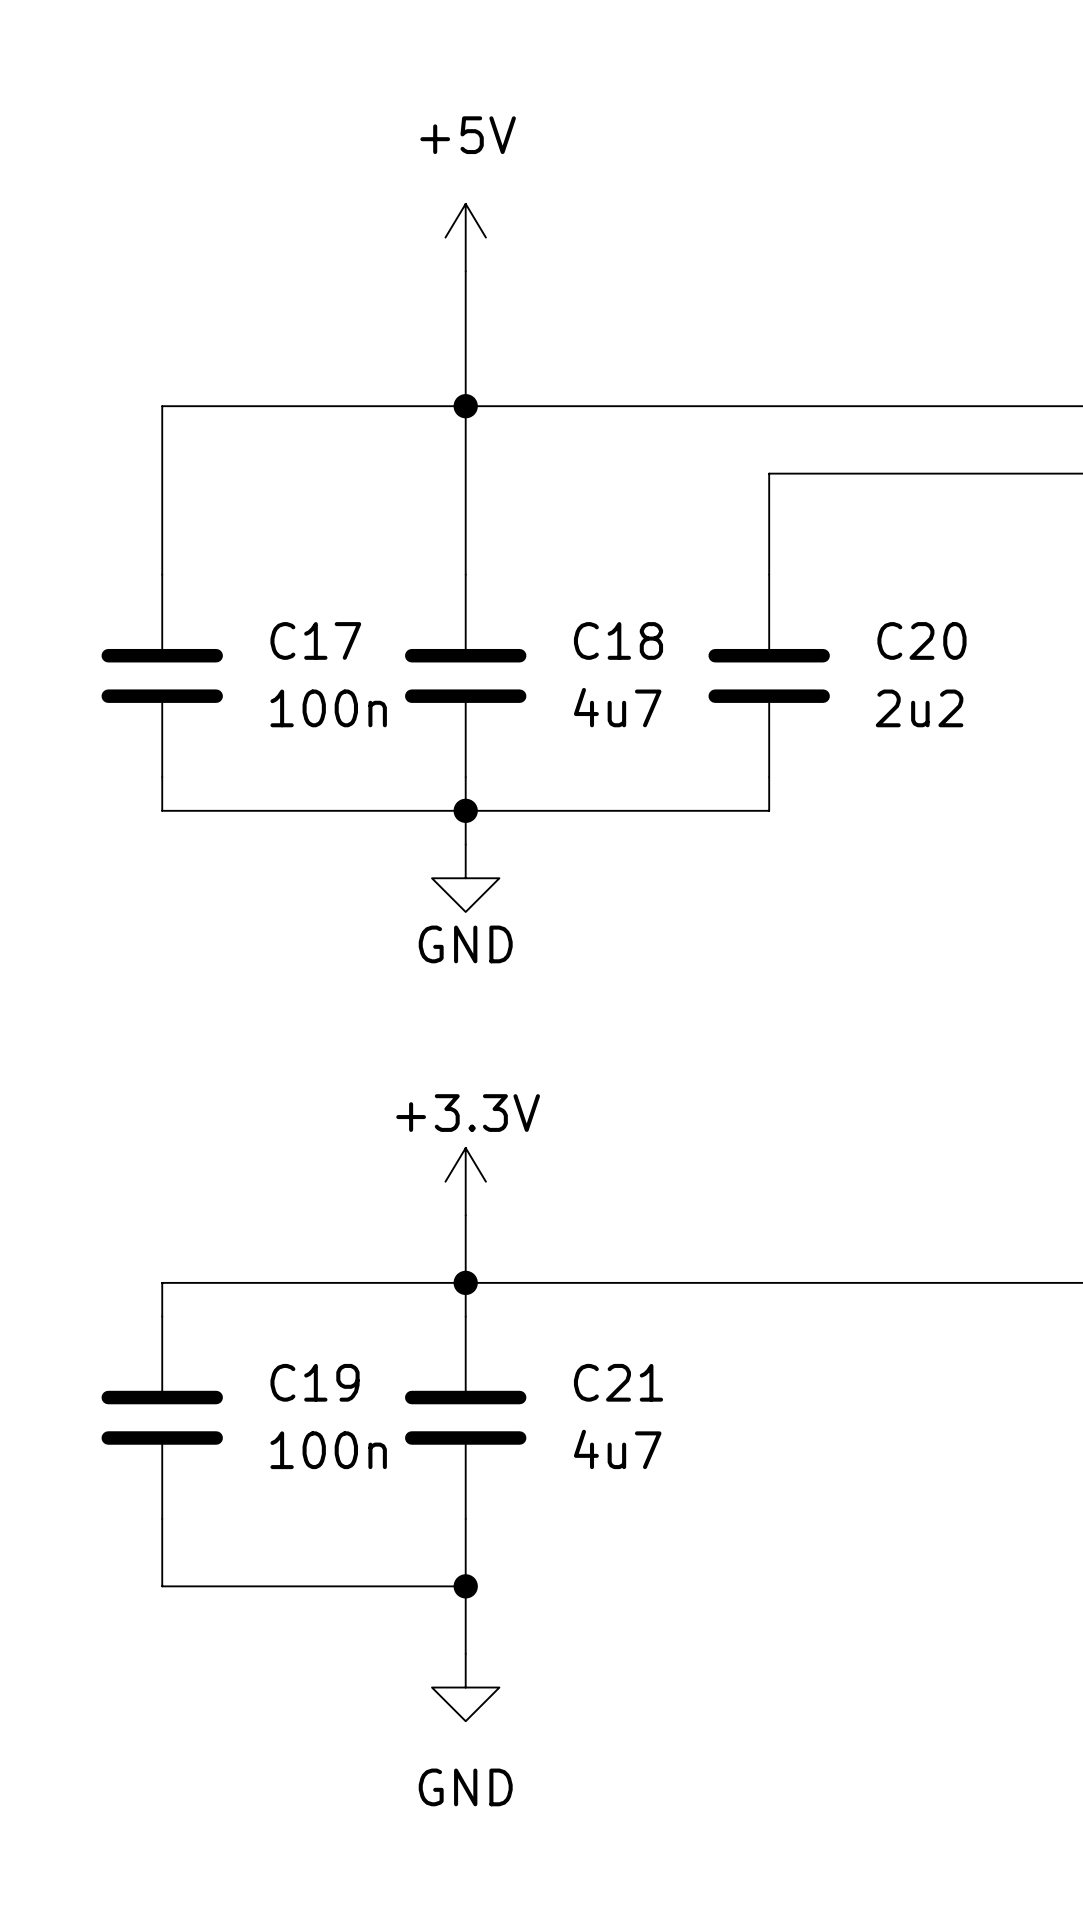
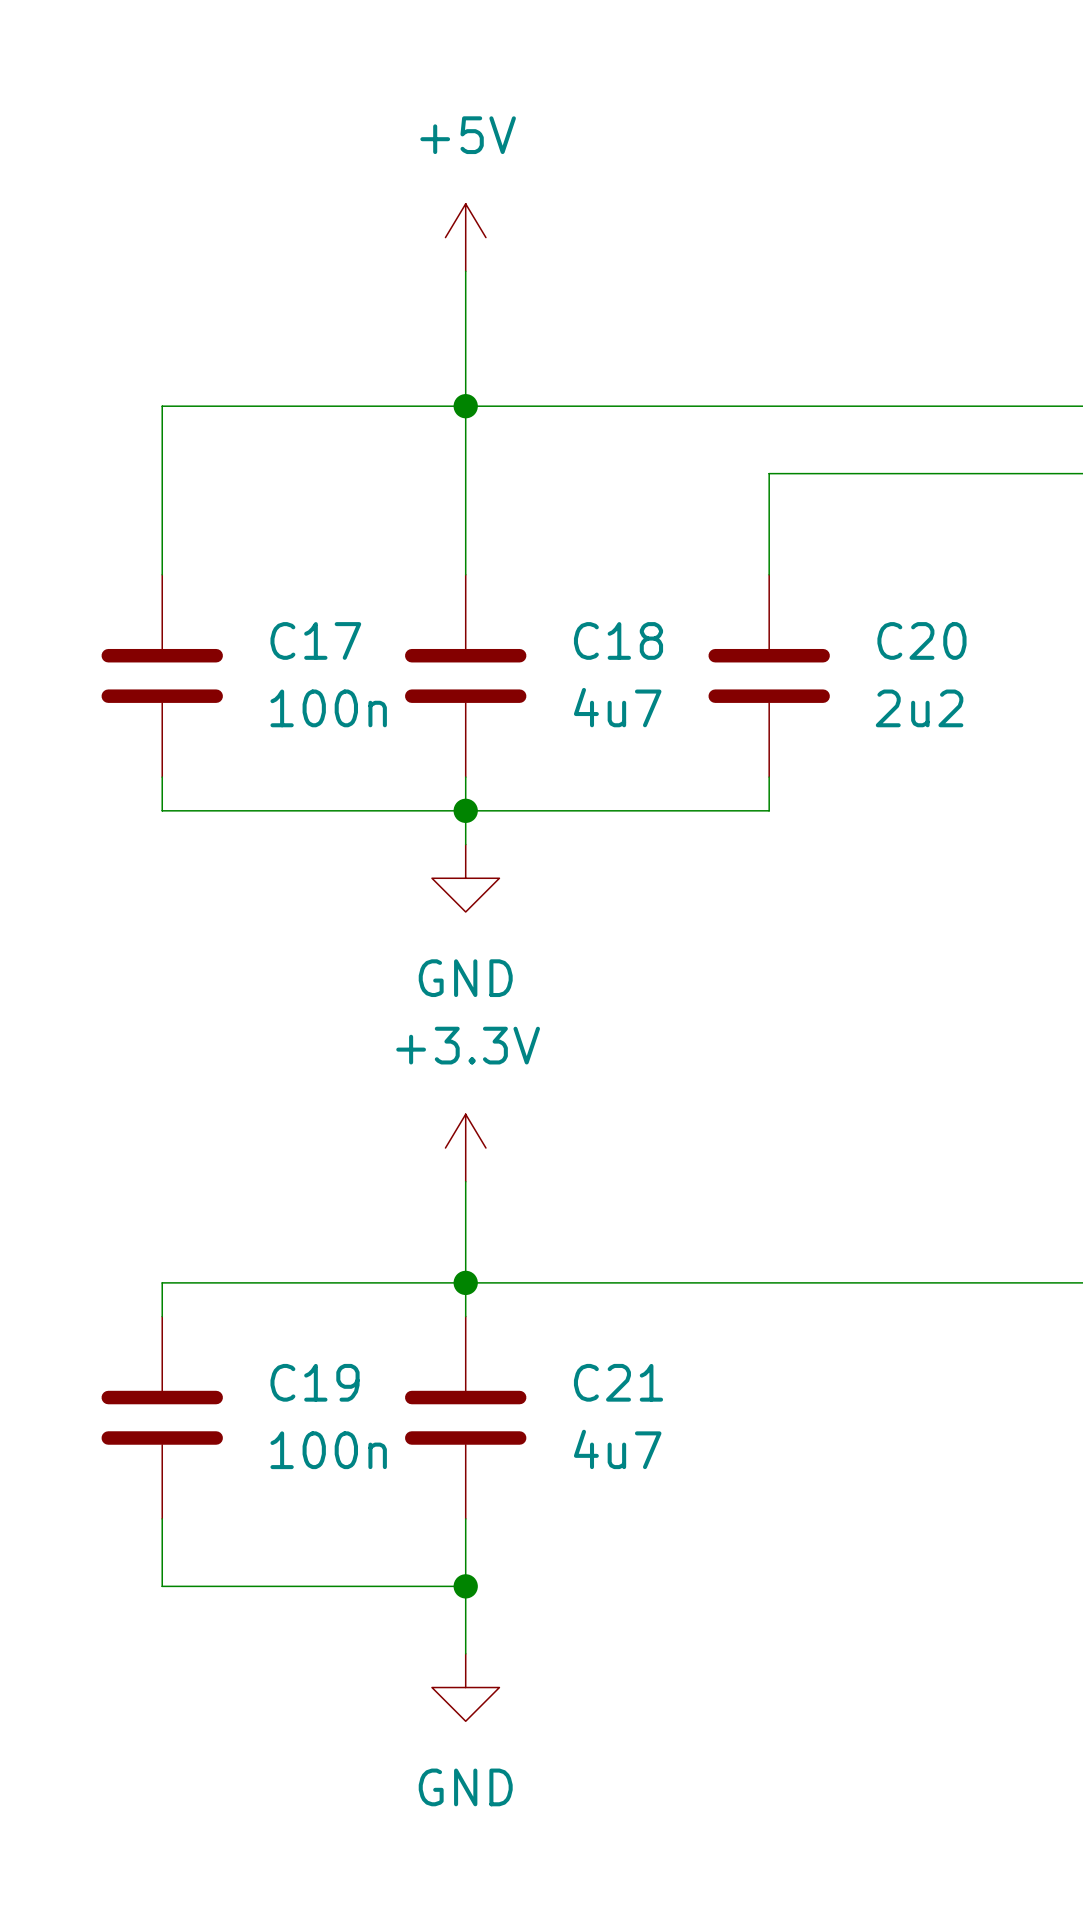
power symbol text position: GND (465, 944) -> GND (465, 978)
power symbol text position: +3.3V (468, 1113) -> +3.3V (468, 1045)
power symbol position: +3.3V (465, 1181) -> +3.3V (465, 1148)

